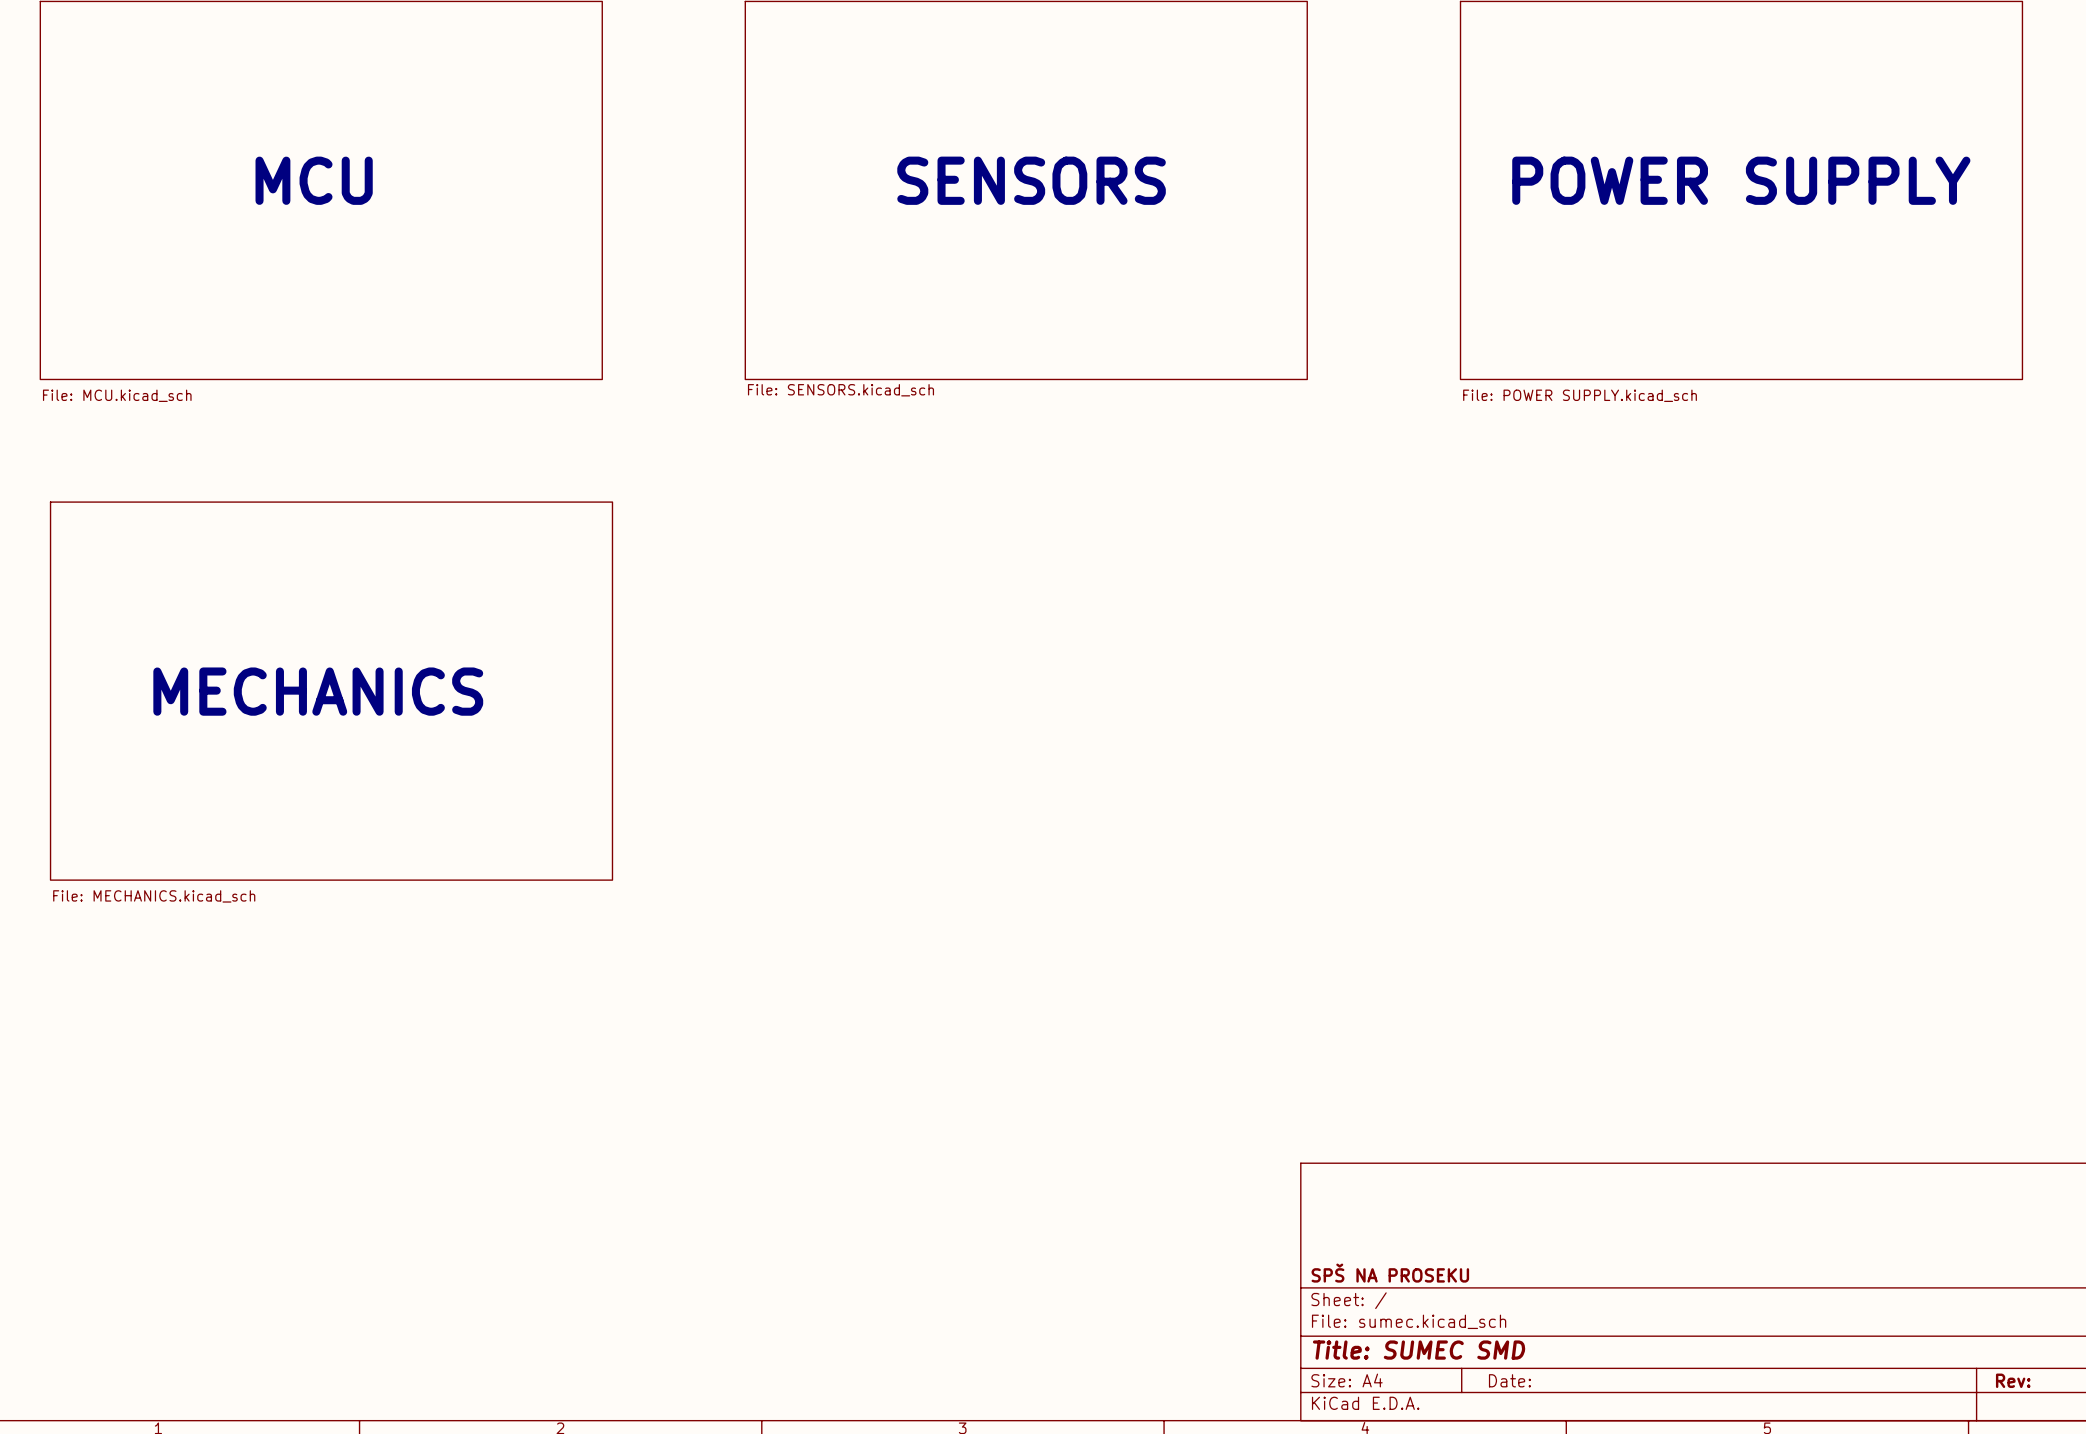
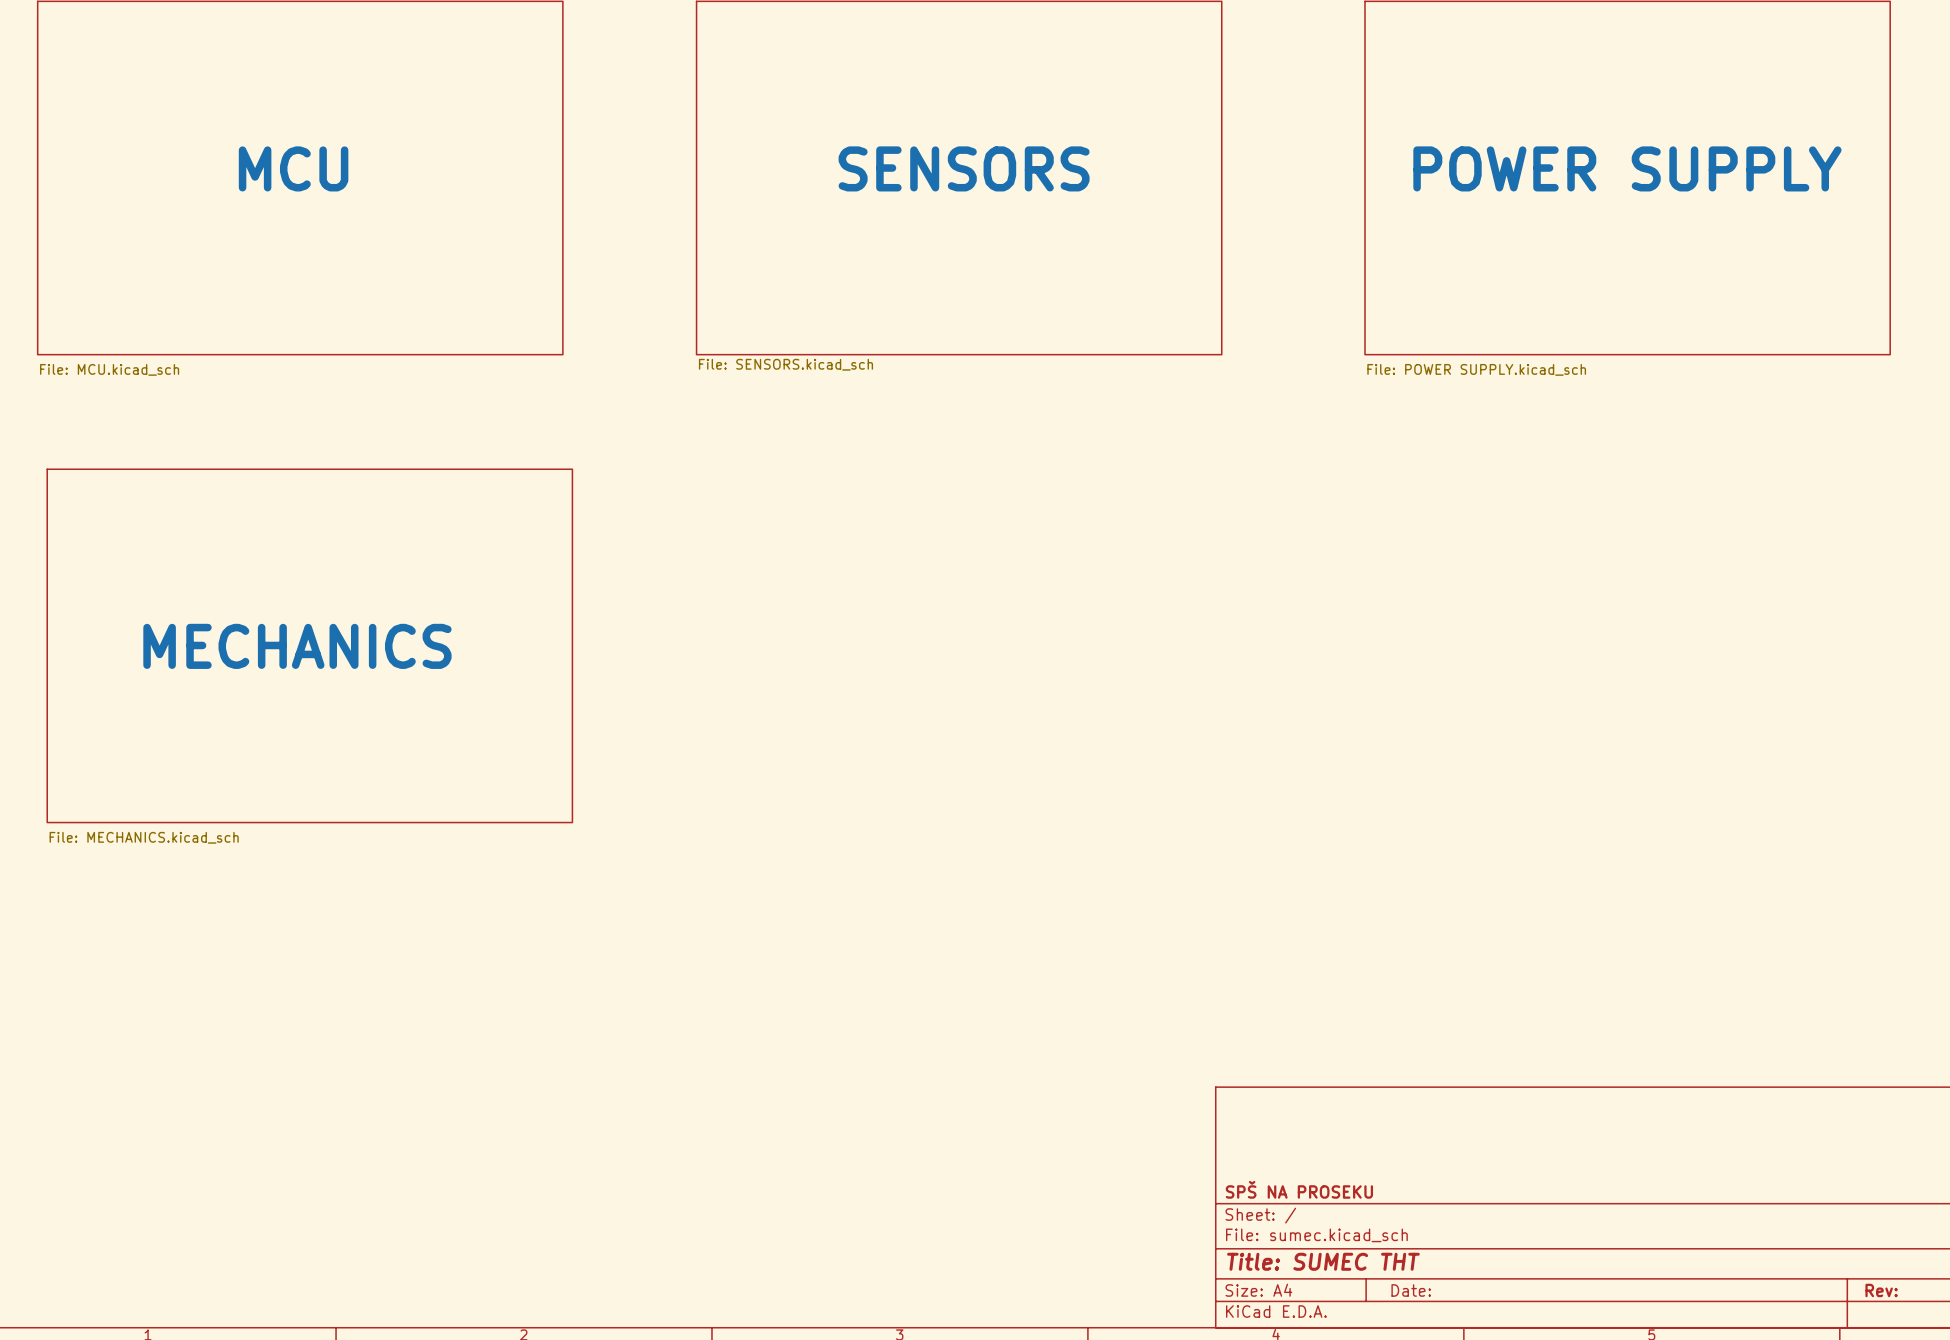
title block: Title: SUMEC SMD (1419, 1350) -> Title: SUMEC THT (1323, 1261)

